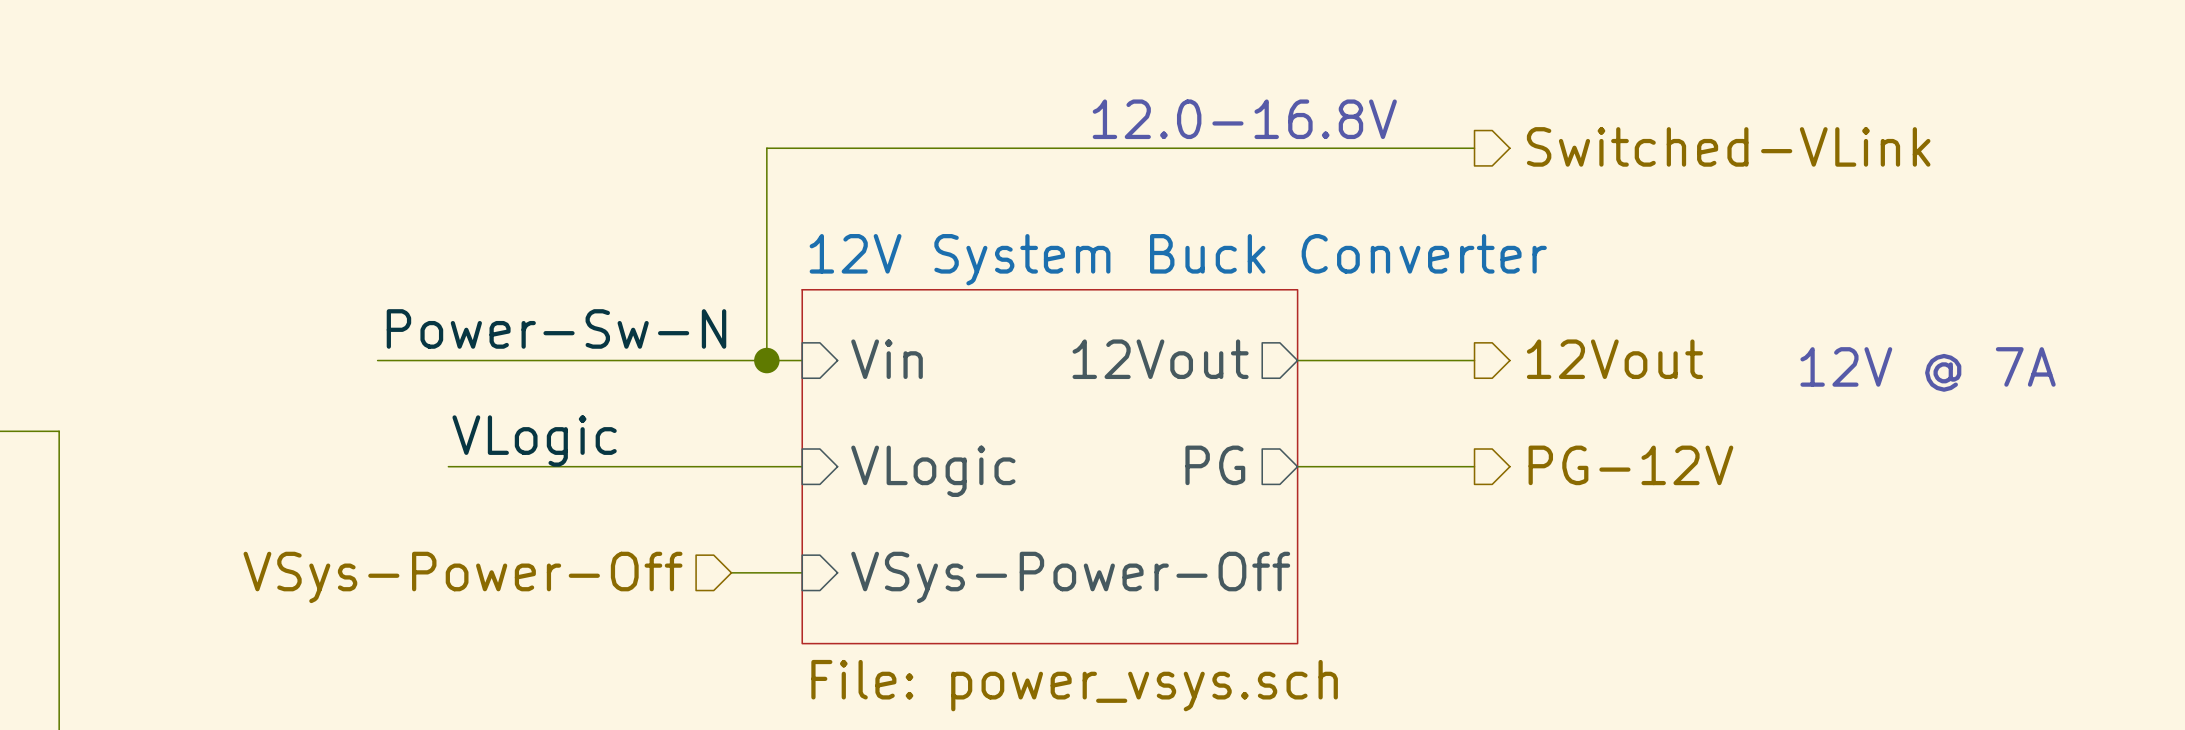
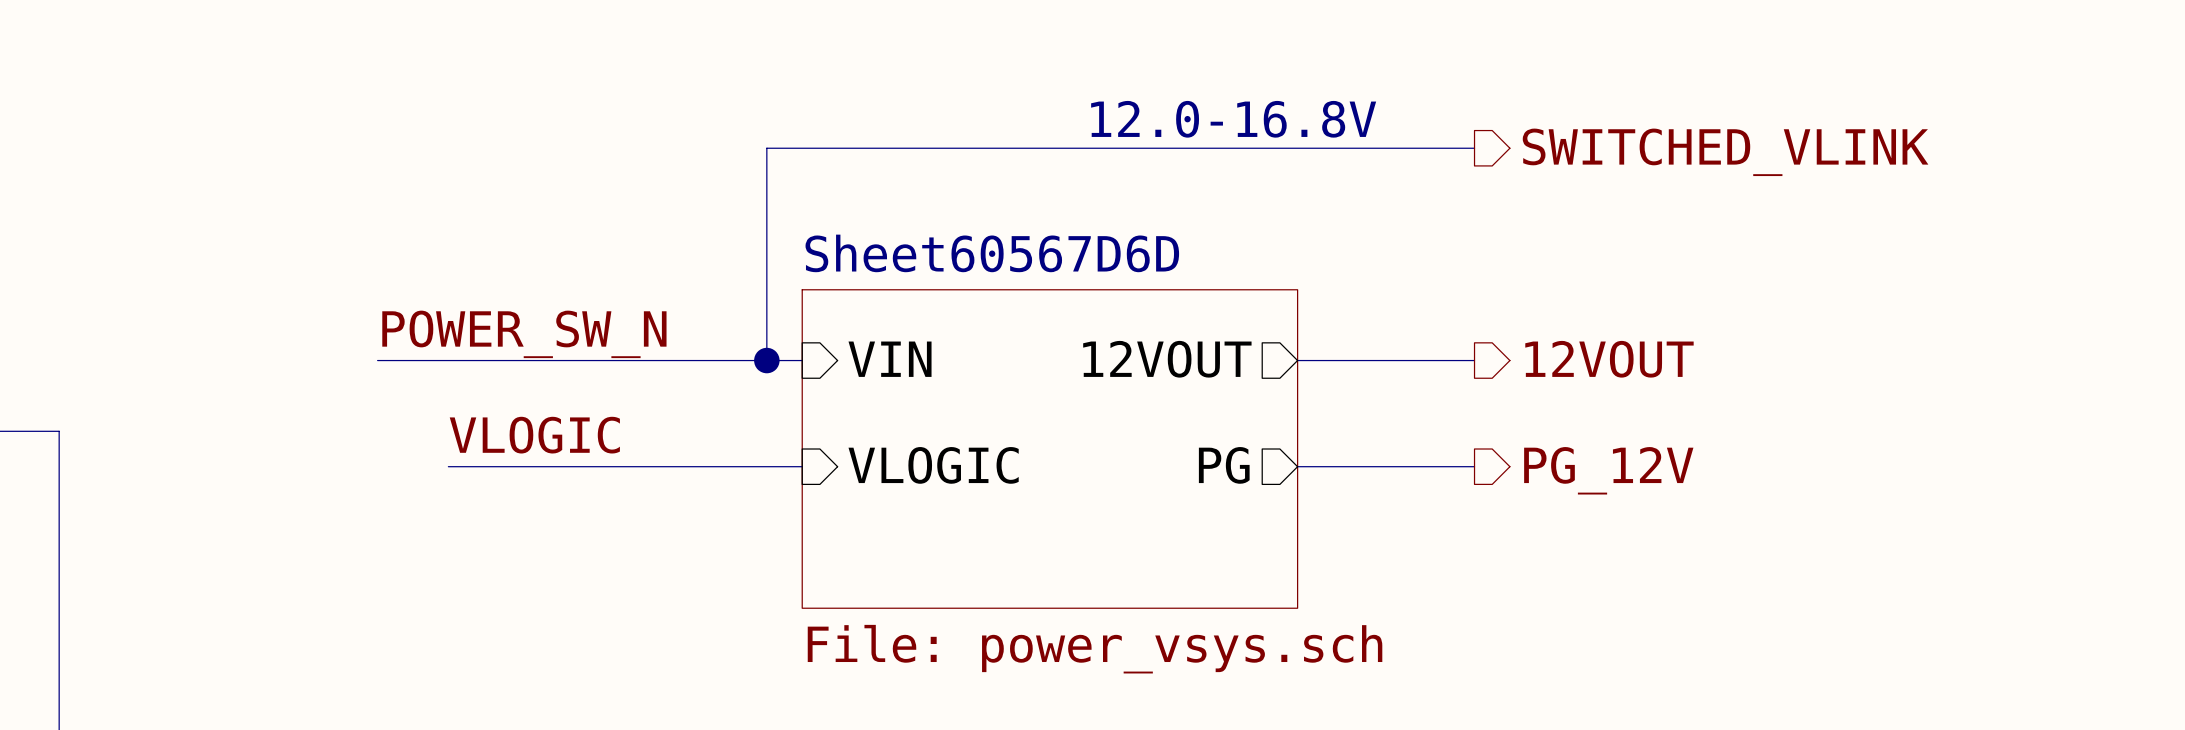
hierarchical label: Switched-VLink (1728, 146) -> SWITCHED_VLINK (1725, 152)
label: Power-Sw-N (556, 328) -> POWER_SW_N (524, 334)
sheet pin: Vin (887, 359) -> VIN (890, 359)
sheet pin: 12Vout (1160, 359) -> 12VOUT (1167, 359)
hierarchical label: 12Vout (1614, 359) -> 12VOUT (1609, 359)
text: 12V @ 7A (1928, 369) -> none
label: VLogic (534, 441) -> VLOGIC (534, 435)
sheet Sheet60567D6D: none -> File: power_vsys.sch (1049, 449)
hierarchical label: PG-12V (1630, 465) -> PG_12V (1608, 470)
sheet 12V System Buck Converter: File: power_vsys.sch (1049, 466) -> none
sheet pin: VLogic (933, 471) -> VLOGIC (933, 465)
wire: (731, 572) (802, 572) -> none
hierarchical label: VSys-Power-Off (463, 577) -> none
sheet pin: VSys-Power-Off (1070, 577) -> none

